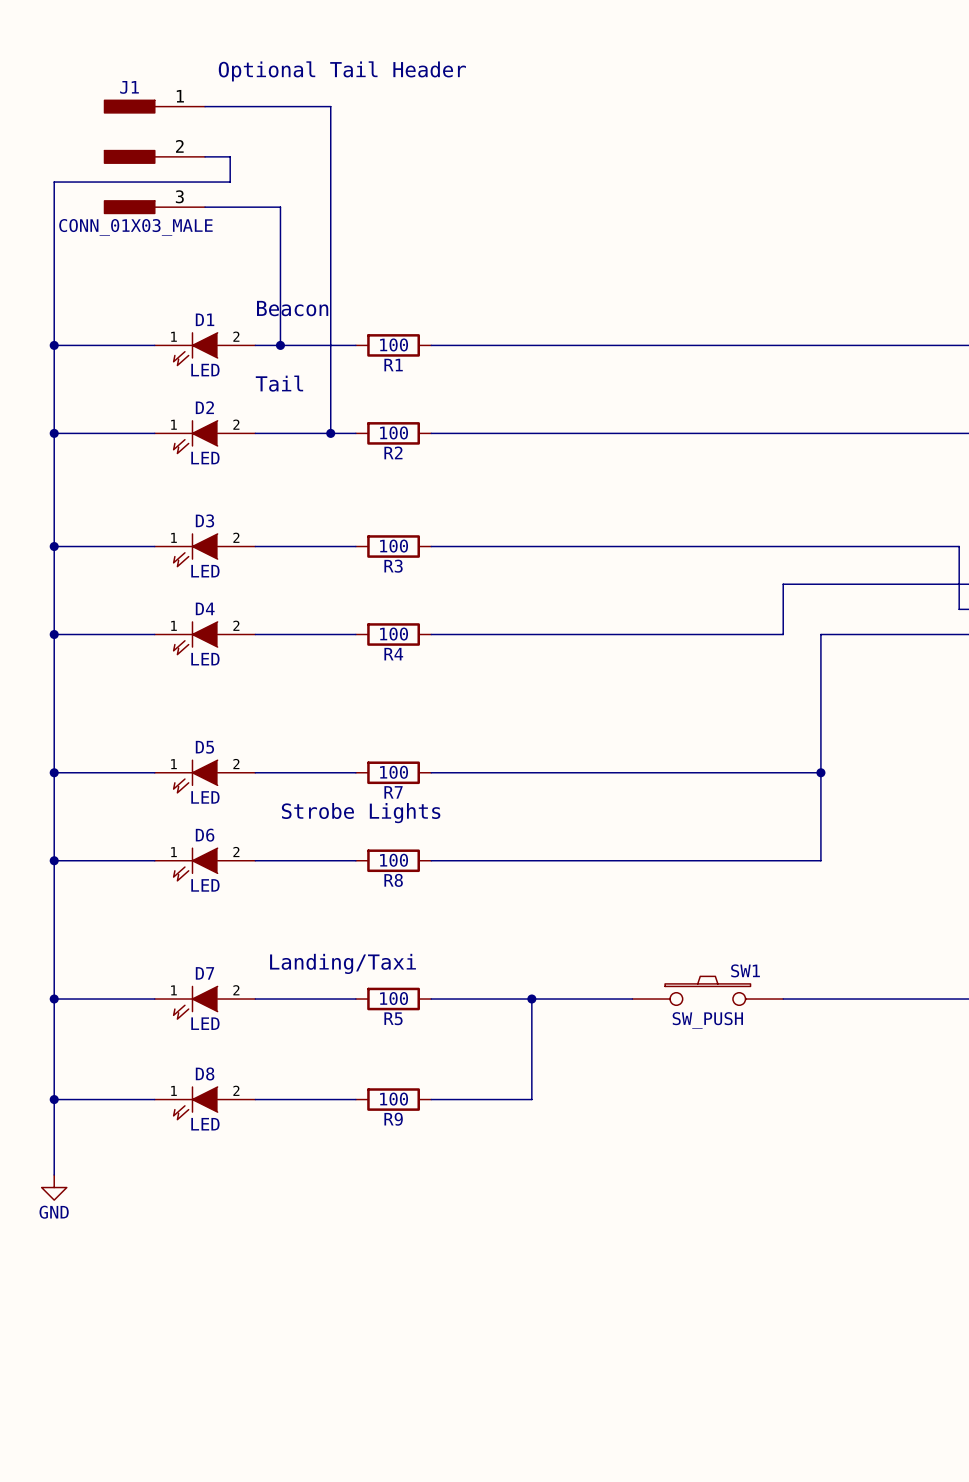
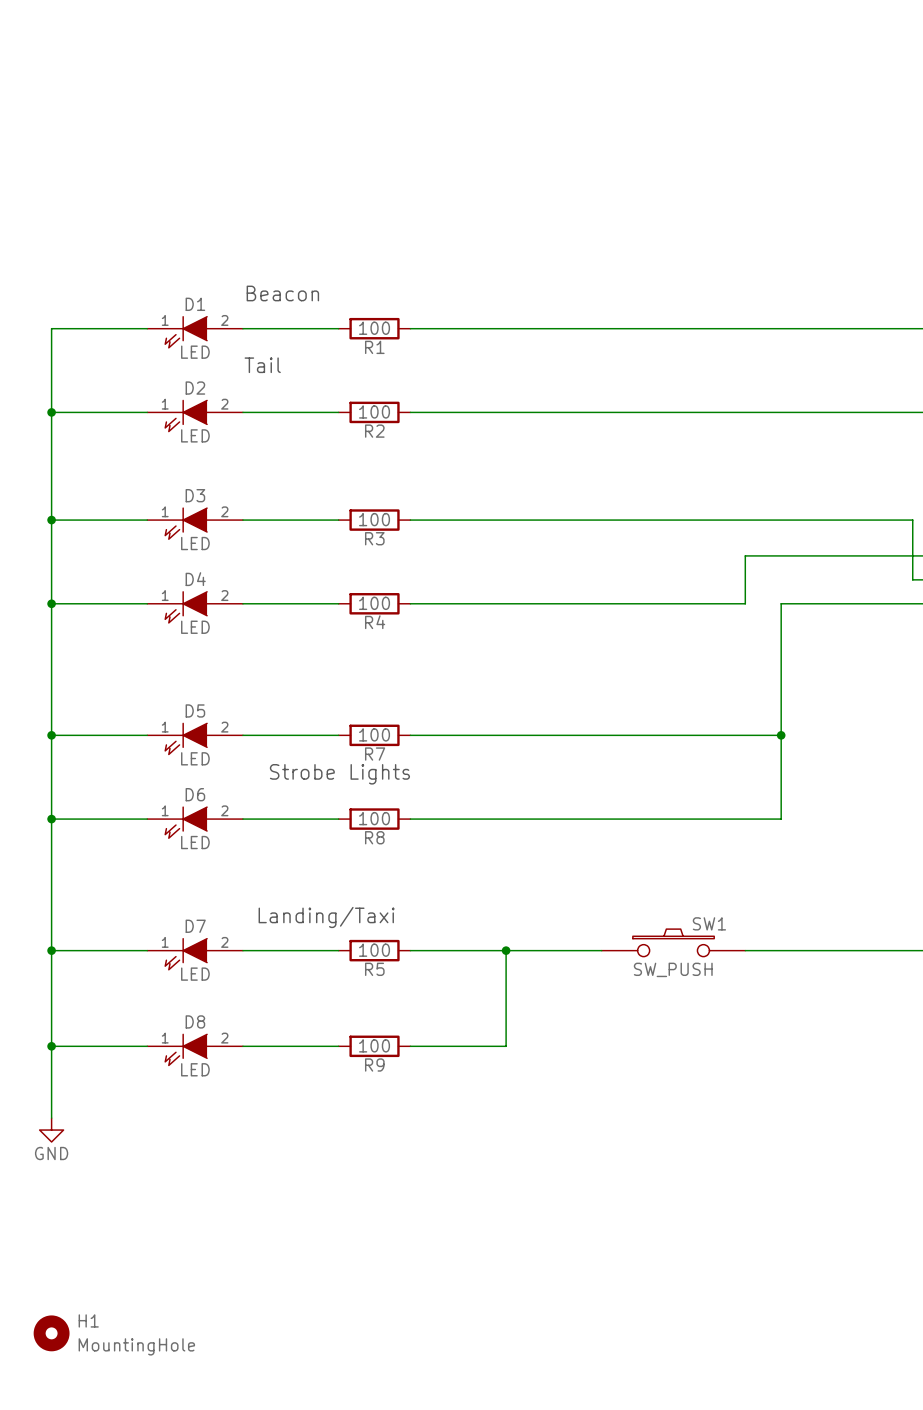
text: Optional Tail Header (342, 71) -> none
wire: (205, 106) (330, 106) (330, 433) -> none
J1: CONN_01X03_MALE (154, 156) -> none
wire: (205, 156) (230, 156) (230, 182) (54, 182) (54, 345) -> none
wire: (205, 207) (280, 207) (280, 345) -> none
junction: (54, 345) -> none
junction: (280, 345) -> none
junction: (330, 433) -> none
H1: none -> MountingHole (51, 1333)

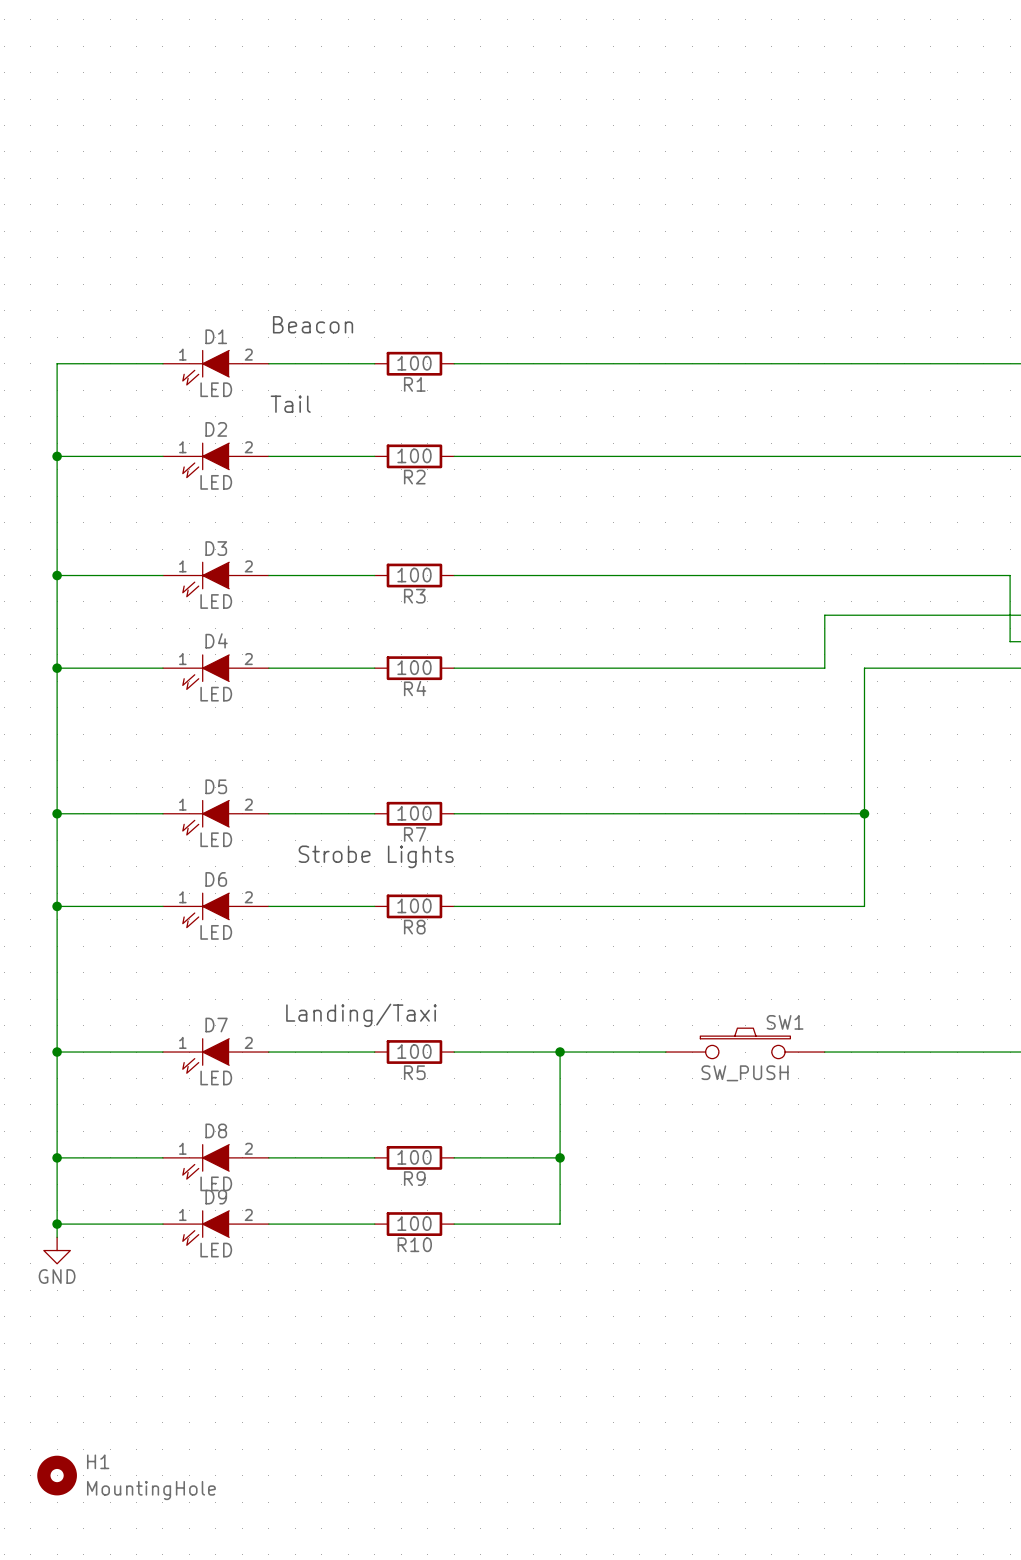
wire: none -> (560, 1157) (560, 1224) (454, 1224)
junction: none -> (560, 1157)
wire: none -> (57, 1224) (162, 1224)
junction: none -> (57, 1224)
wire: none -> (268, 1224) (374, 1224)
R10: none -> 100 (414, 1224)
D9: none -> LED (215, 1228)

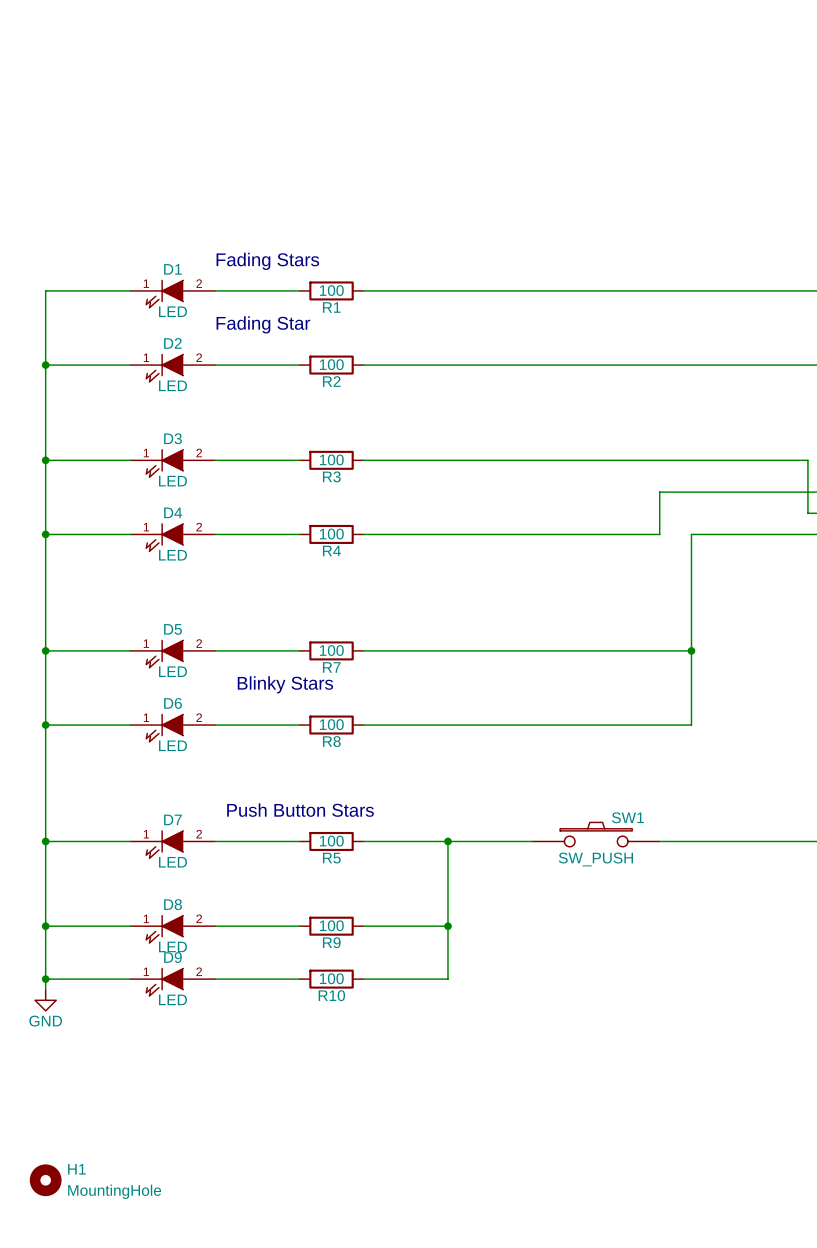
text: Beacon (313, 324) -> Fading Stars (267, 261)
text: Tail (290, 404) -> Fading Star (263, 324)
text: Strobe Lights (376, 856) -> Blinky Stars (285, 684)
text: Landing/Taxi (361, 1015) -> Push Button Stars (300, 810)

